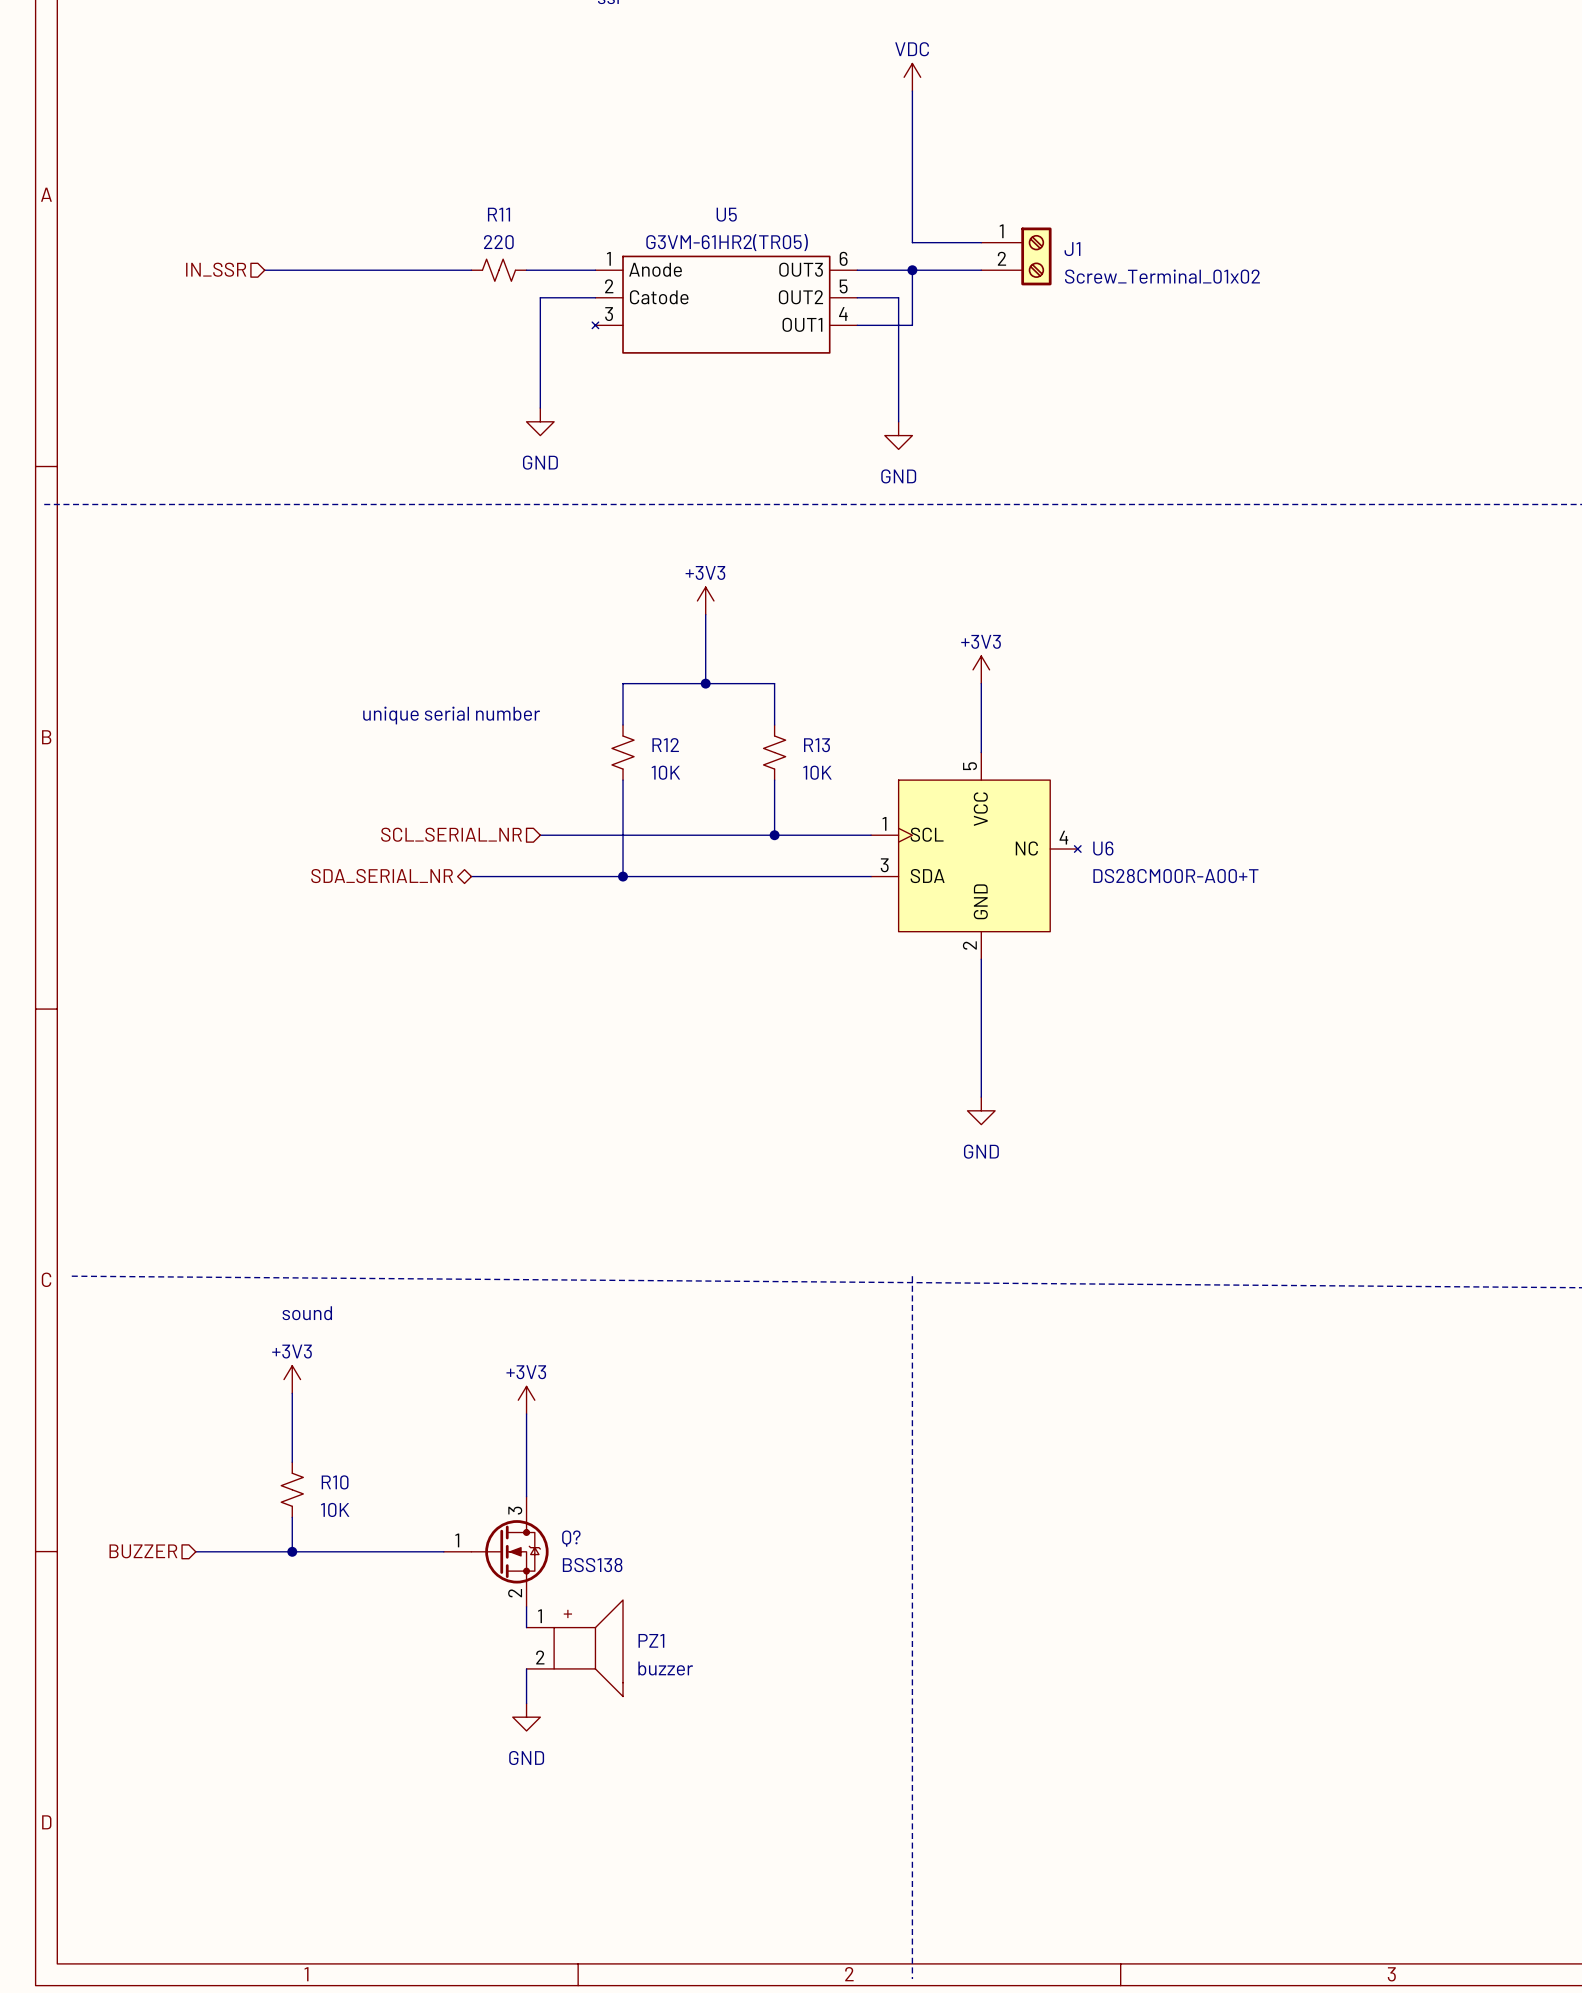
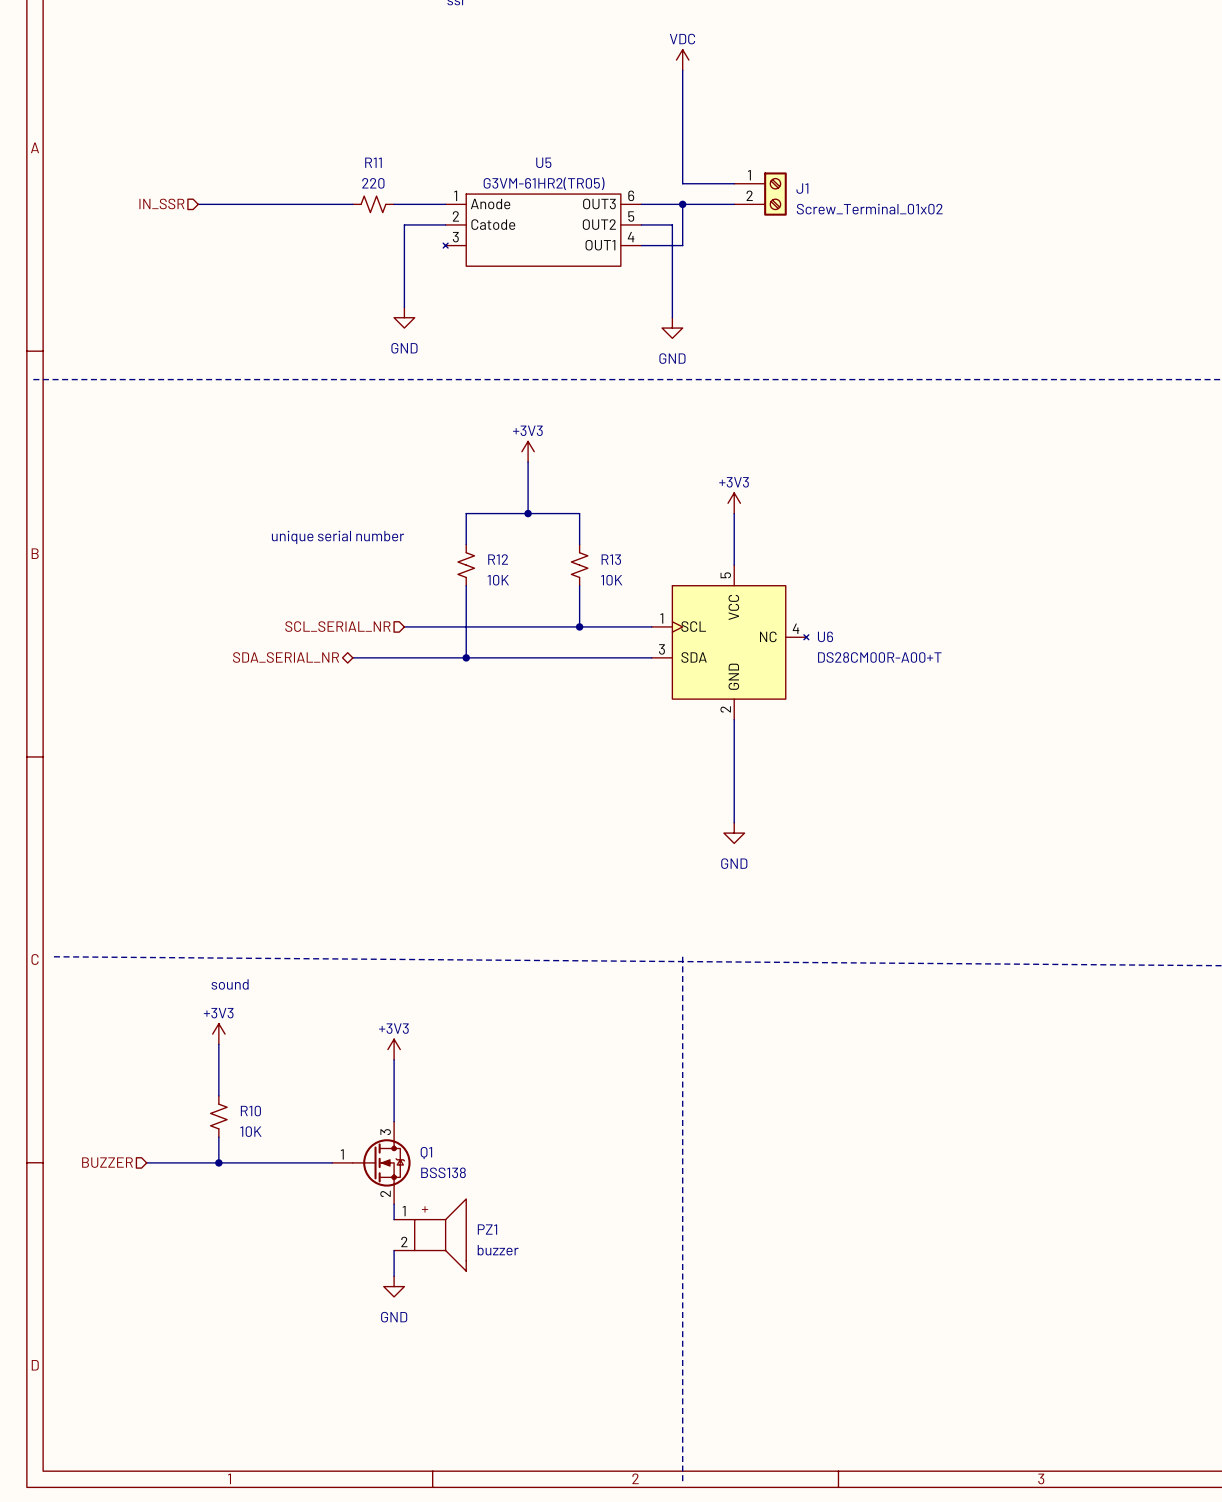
Q? name: Q? (571, 1538) -> Q1 (426, 1153)

